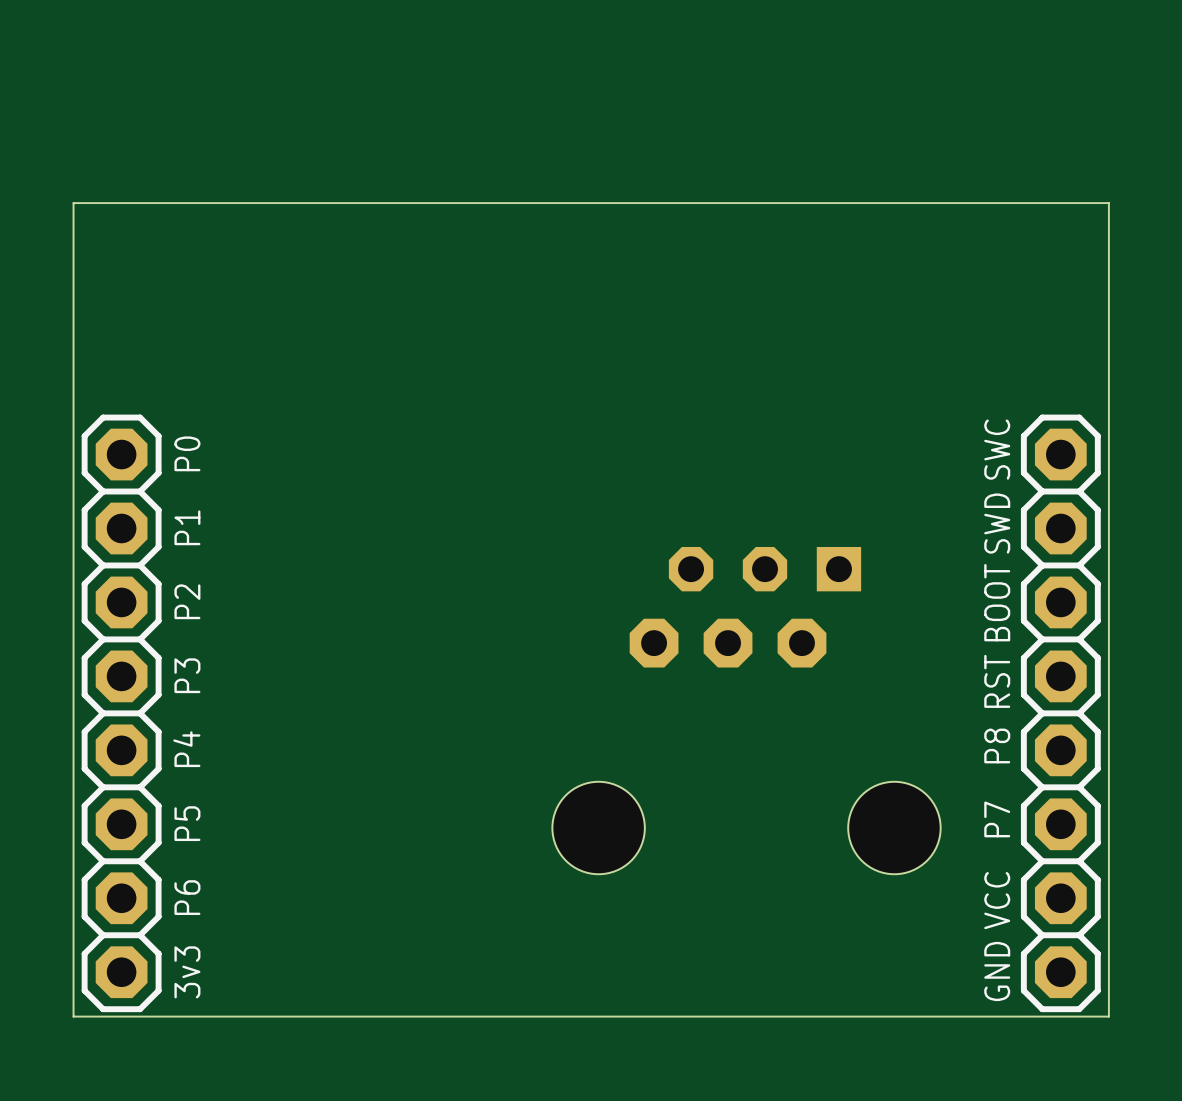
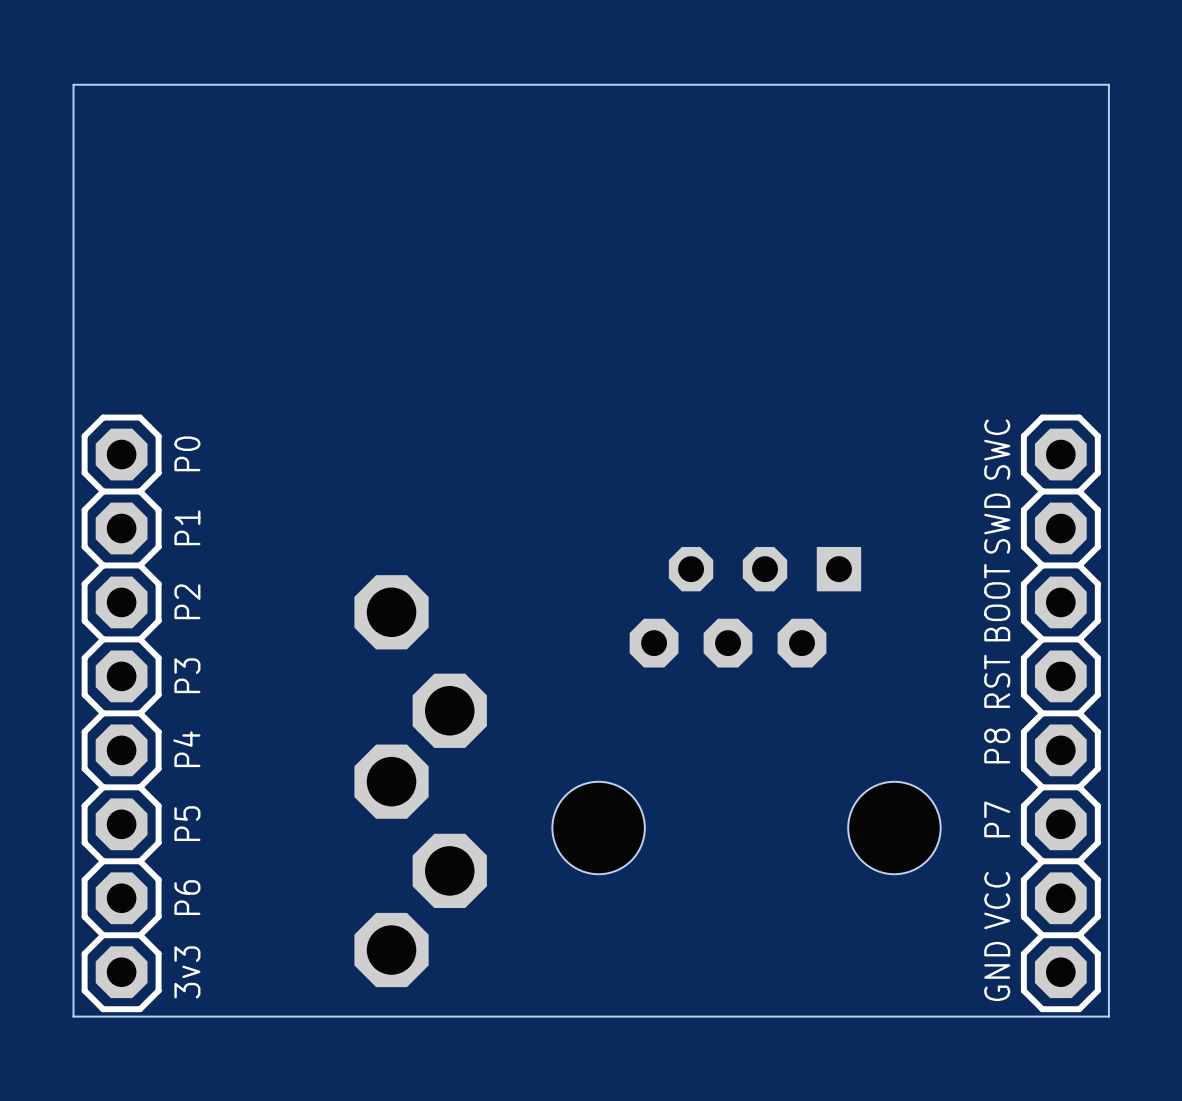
board edge: (1108, 203) (73, 203) -> (1108, 203) (1108, 84) (73, 84) (73, 203)
part: none -> (420, 781)

